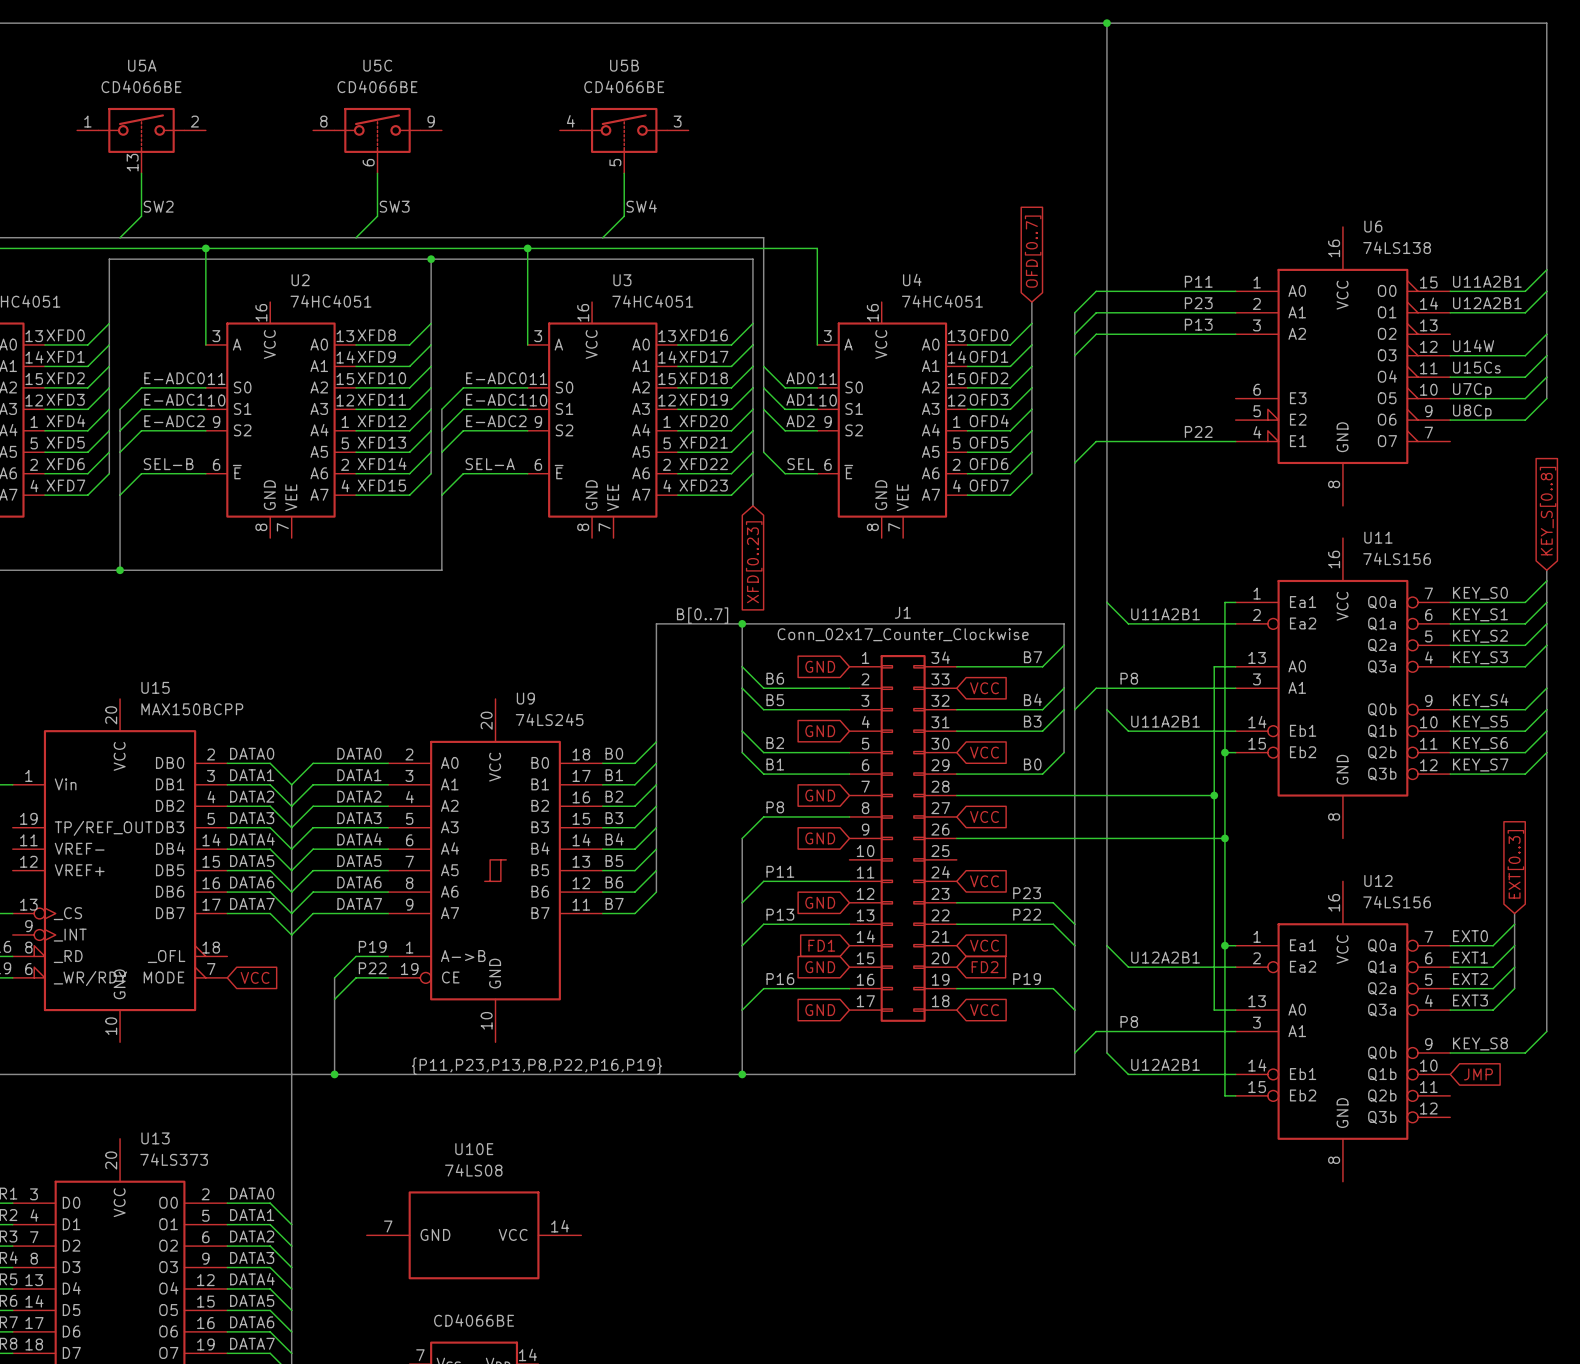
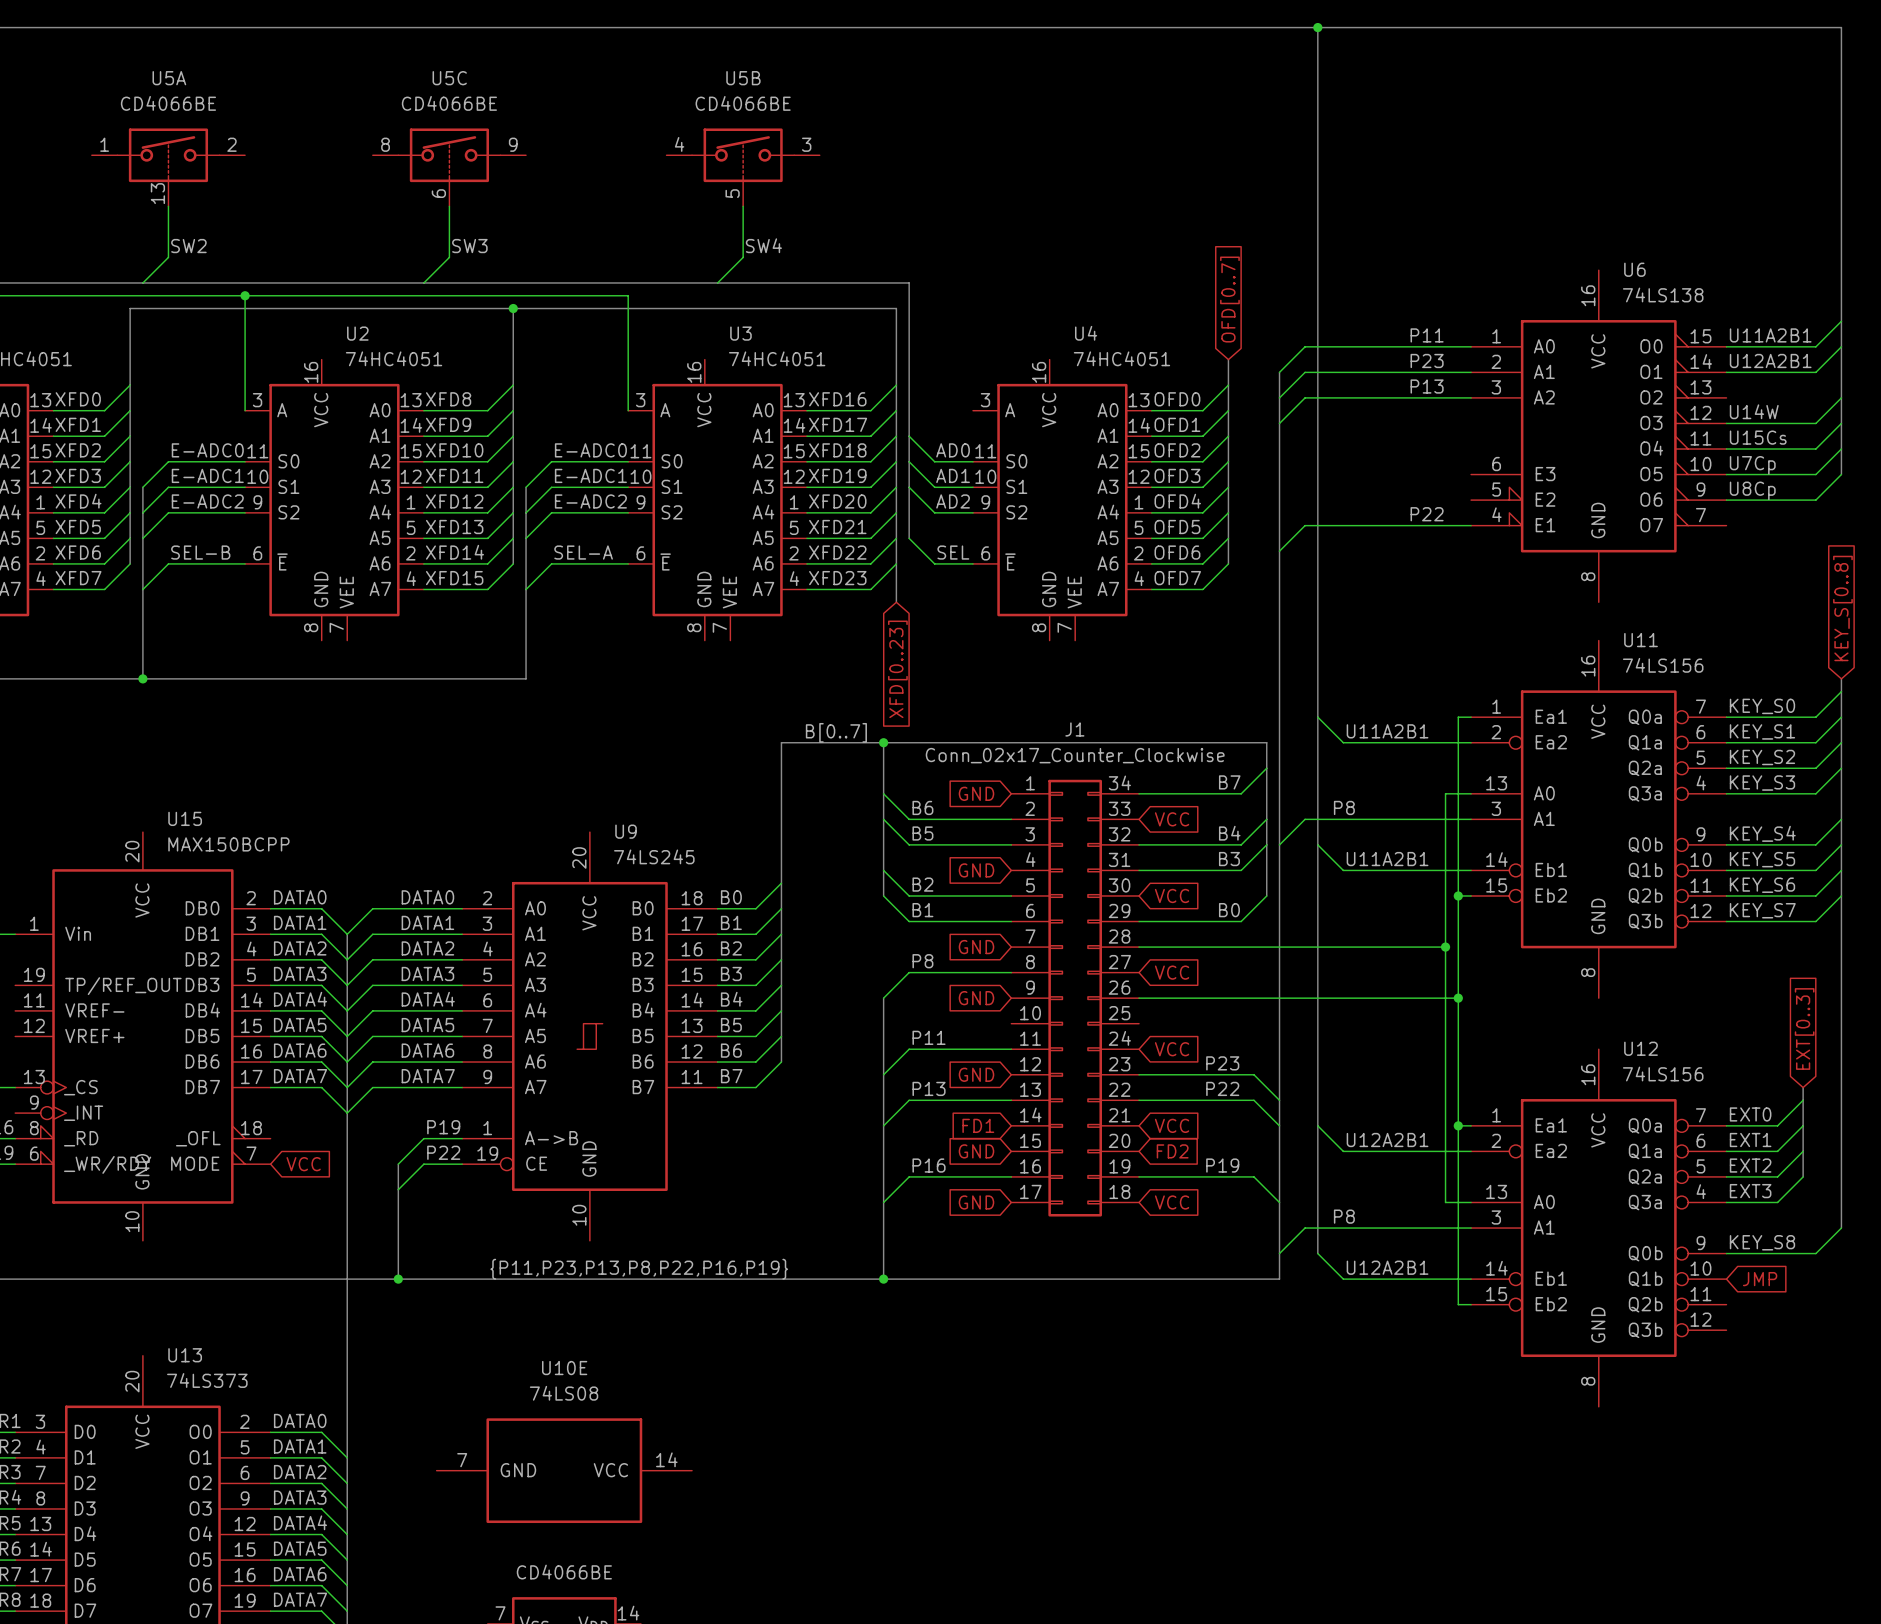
wire: (527, 248) (817, 248) (817, 344) -> none
junction: (527, 248) -> none

